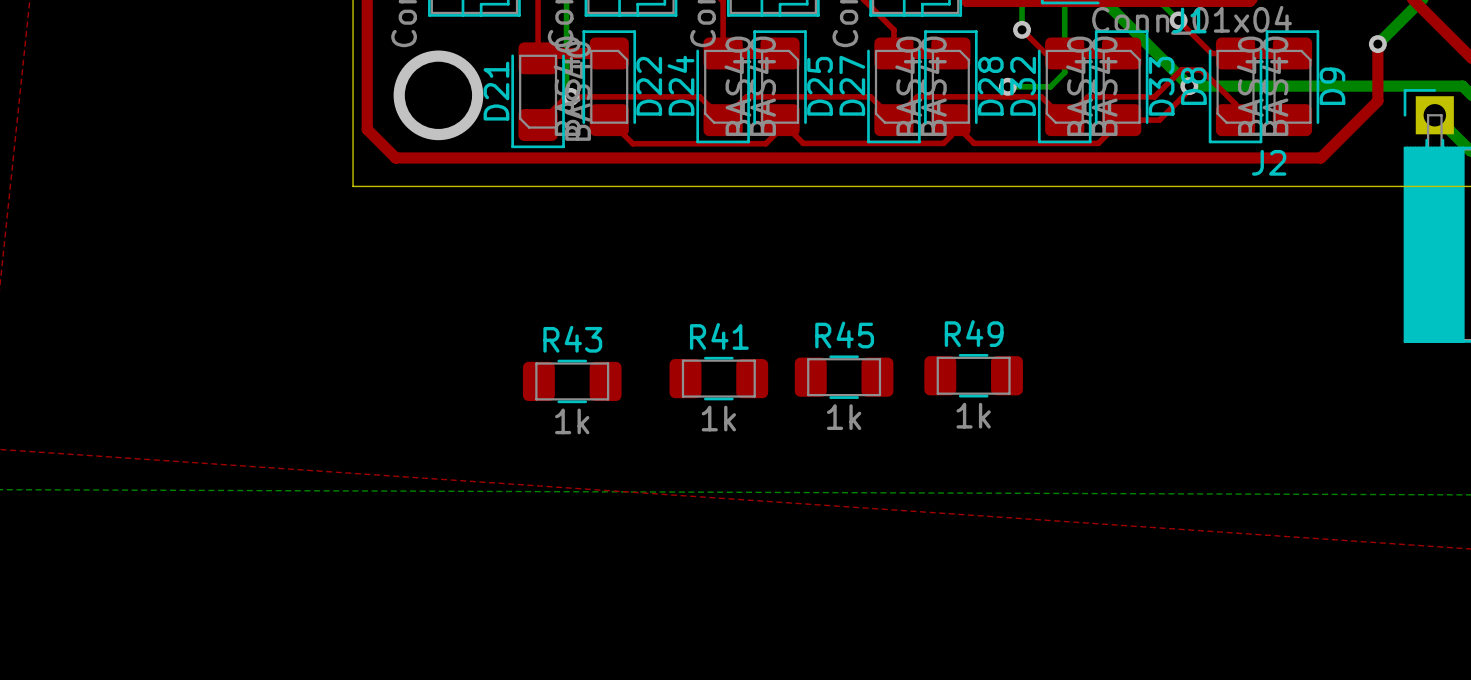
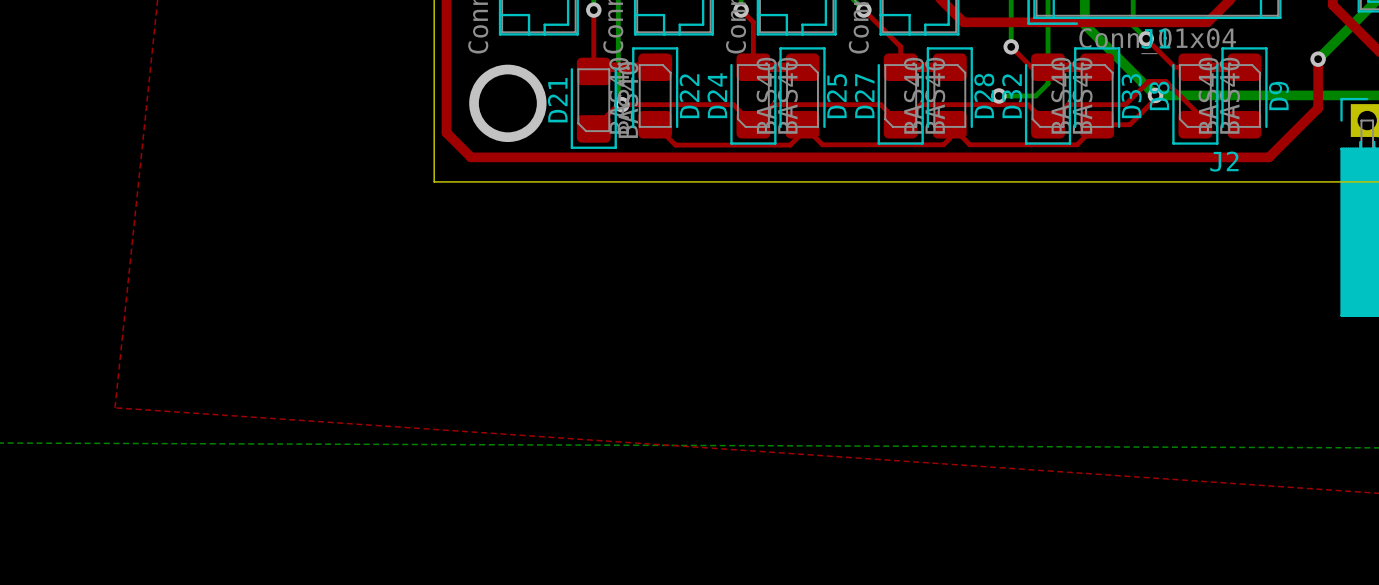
R49: 1k (973, 375) -> none
R45: 1k (844, 377) -> none
R41: 1k (718, 378) -> none
R43: 1k (572, 381) -> none

